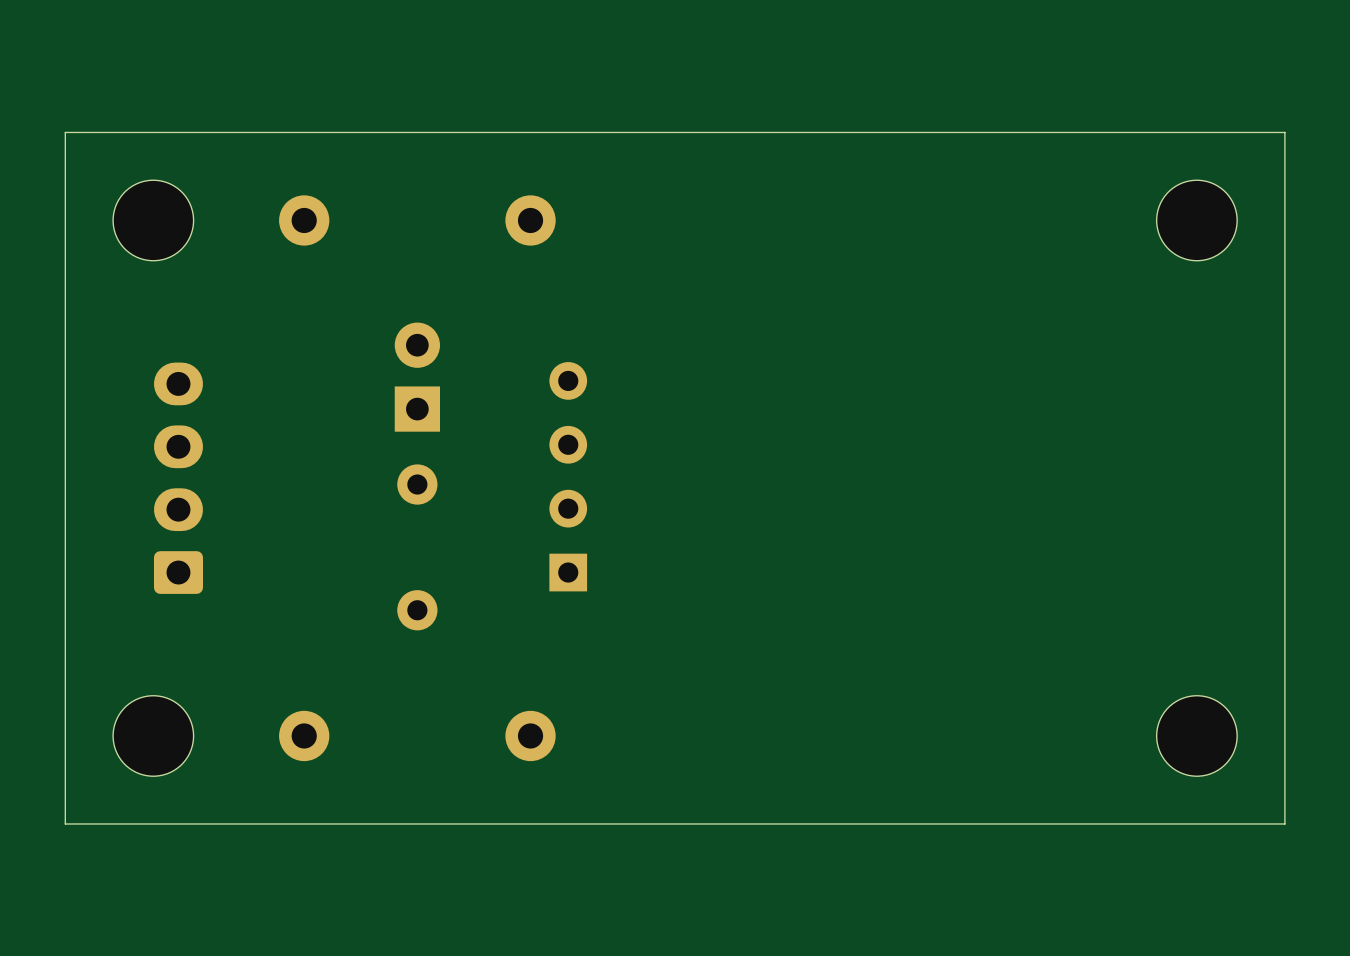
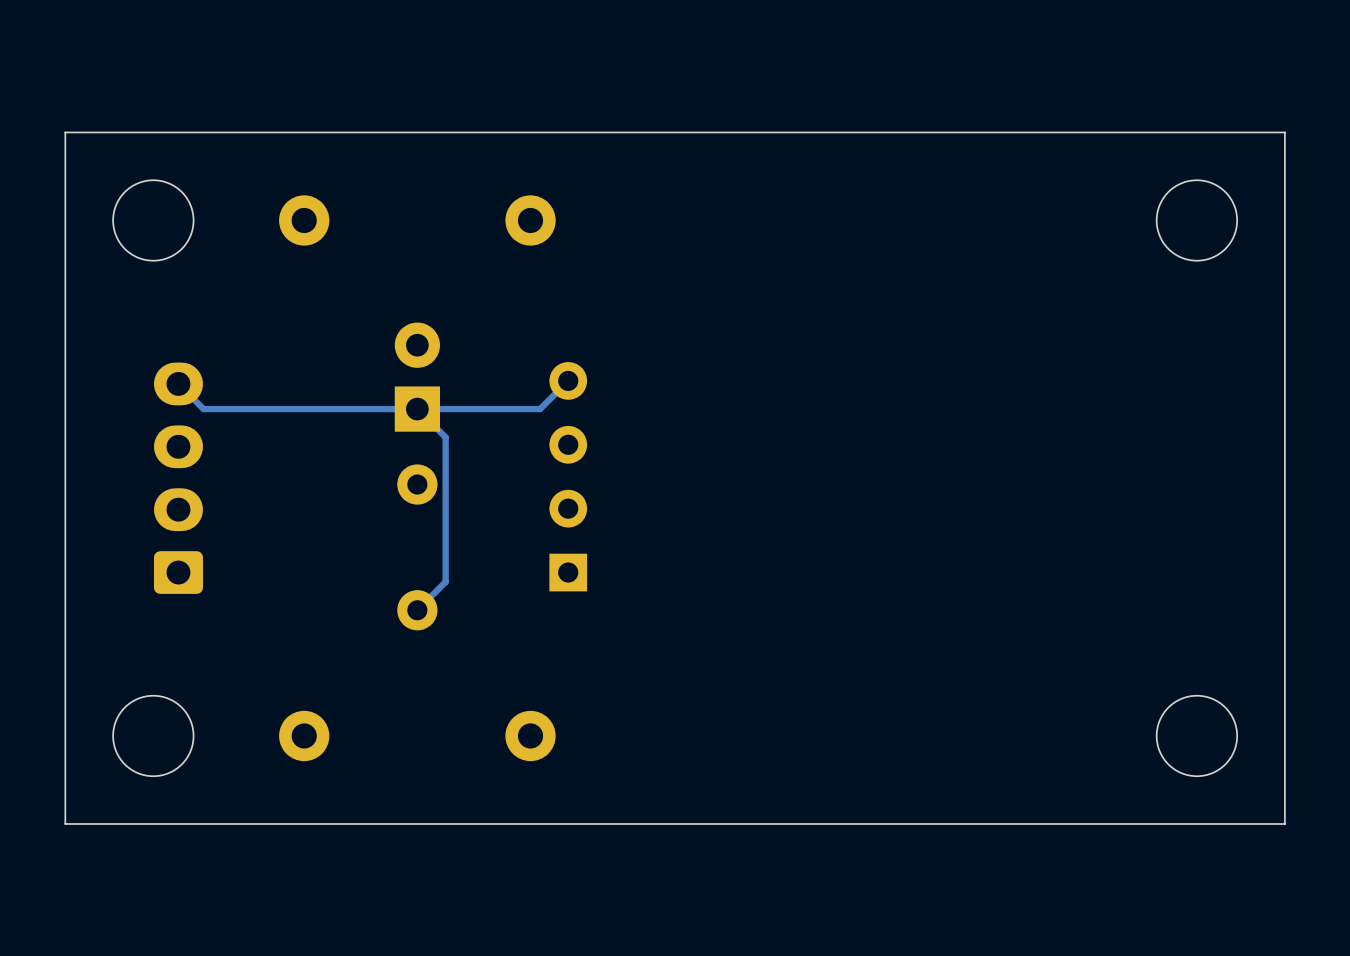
track: none -> (568, 380) (540, 409) (203, 409) (178, 383)
track: none -> (417, 409) (445, 437) (445, 581) (417, 610)

